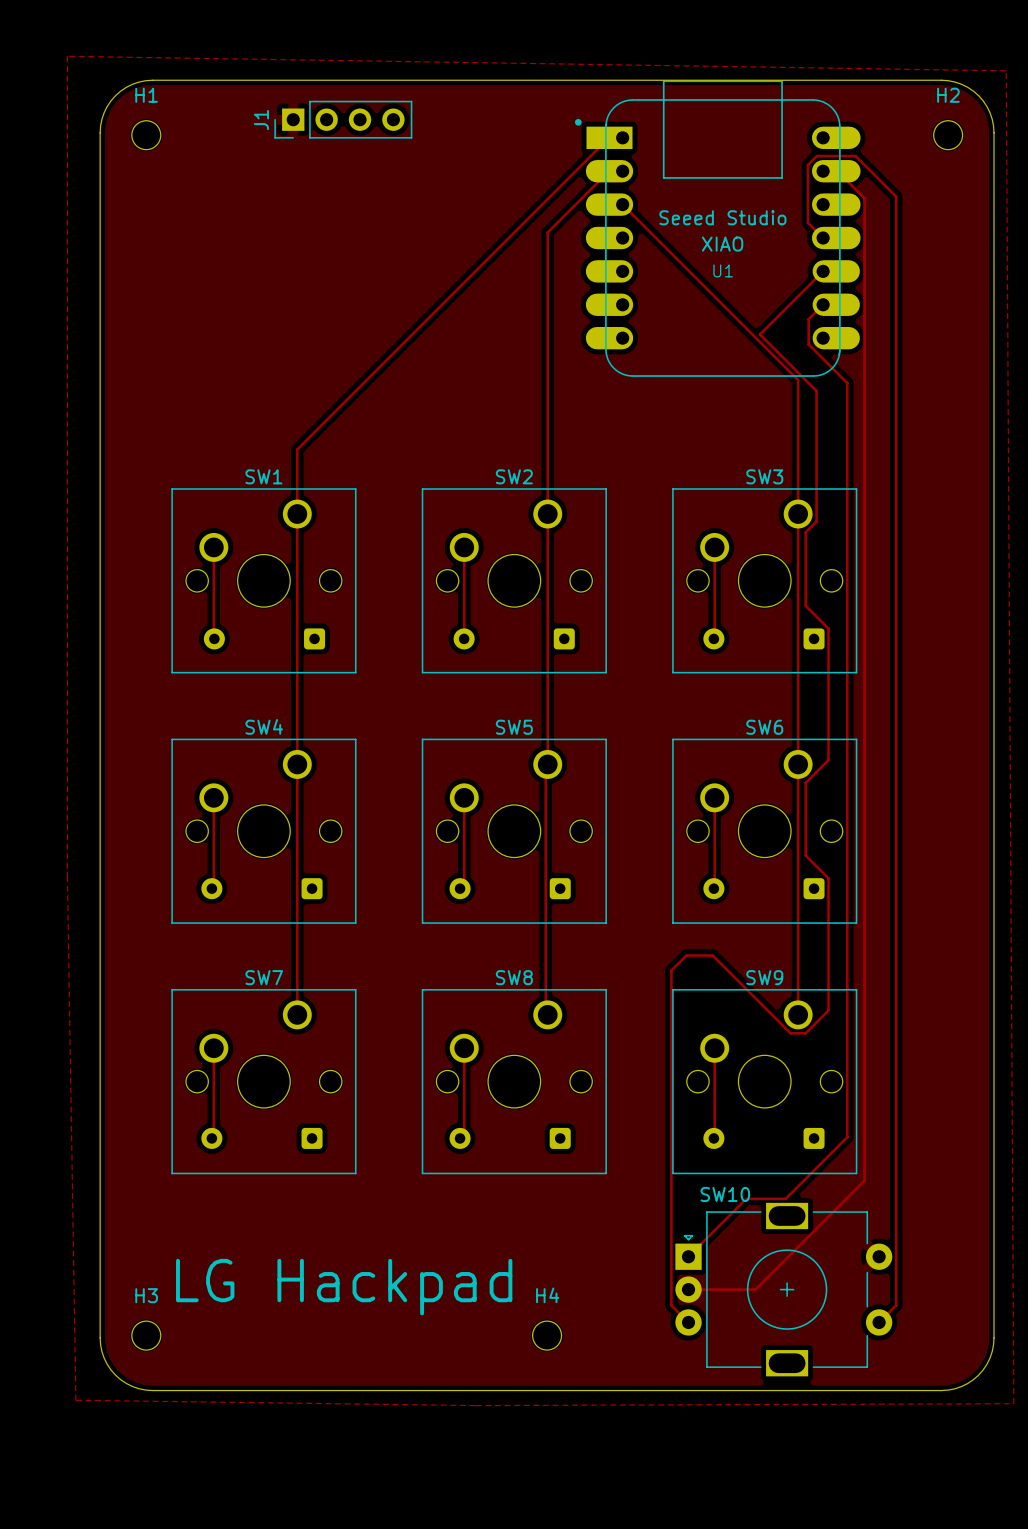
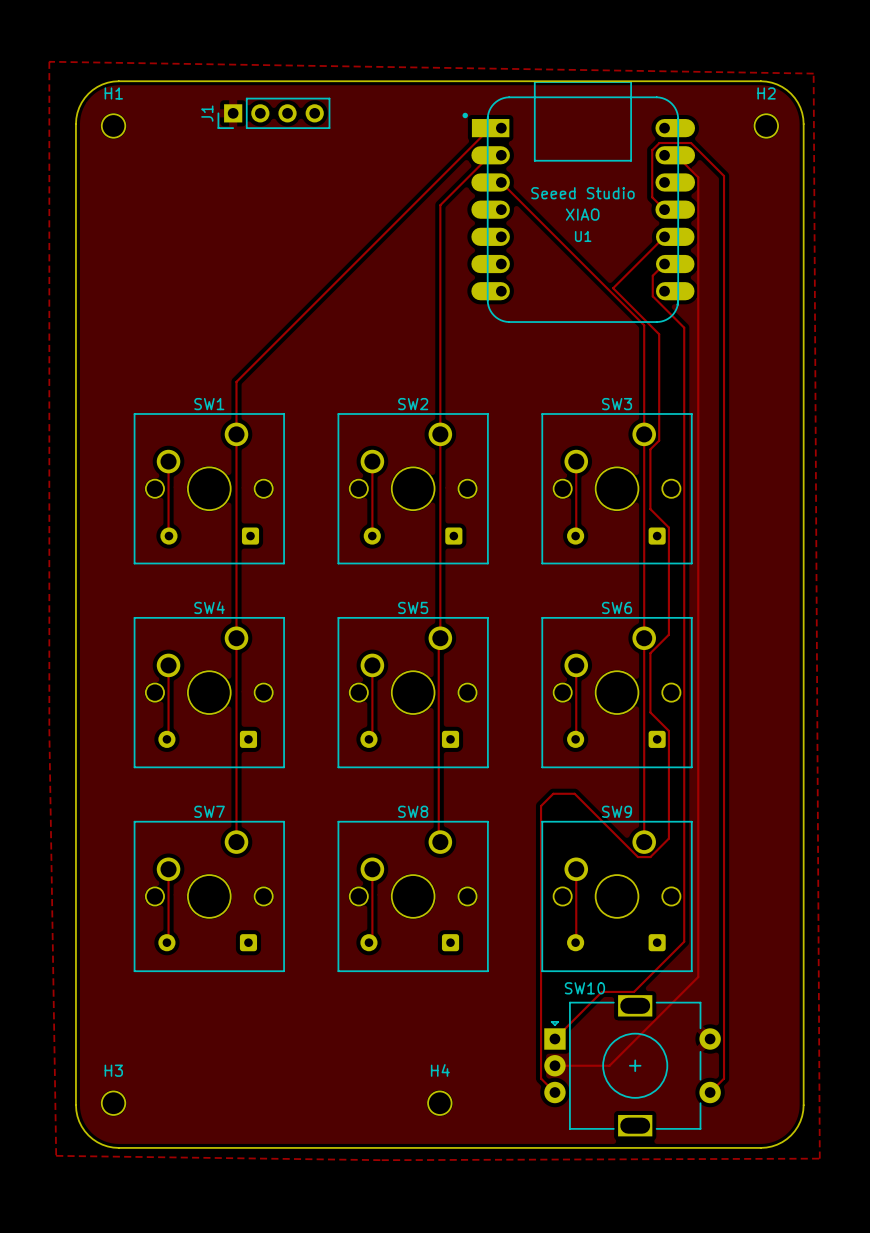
text: LG Hackpad (344, 1287) -> none

